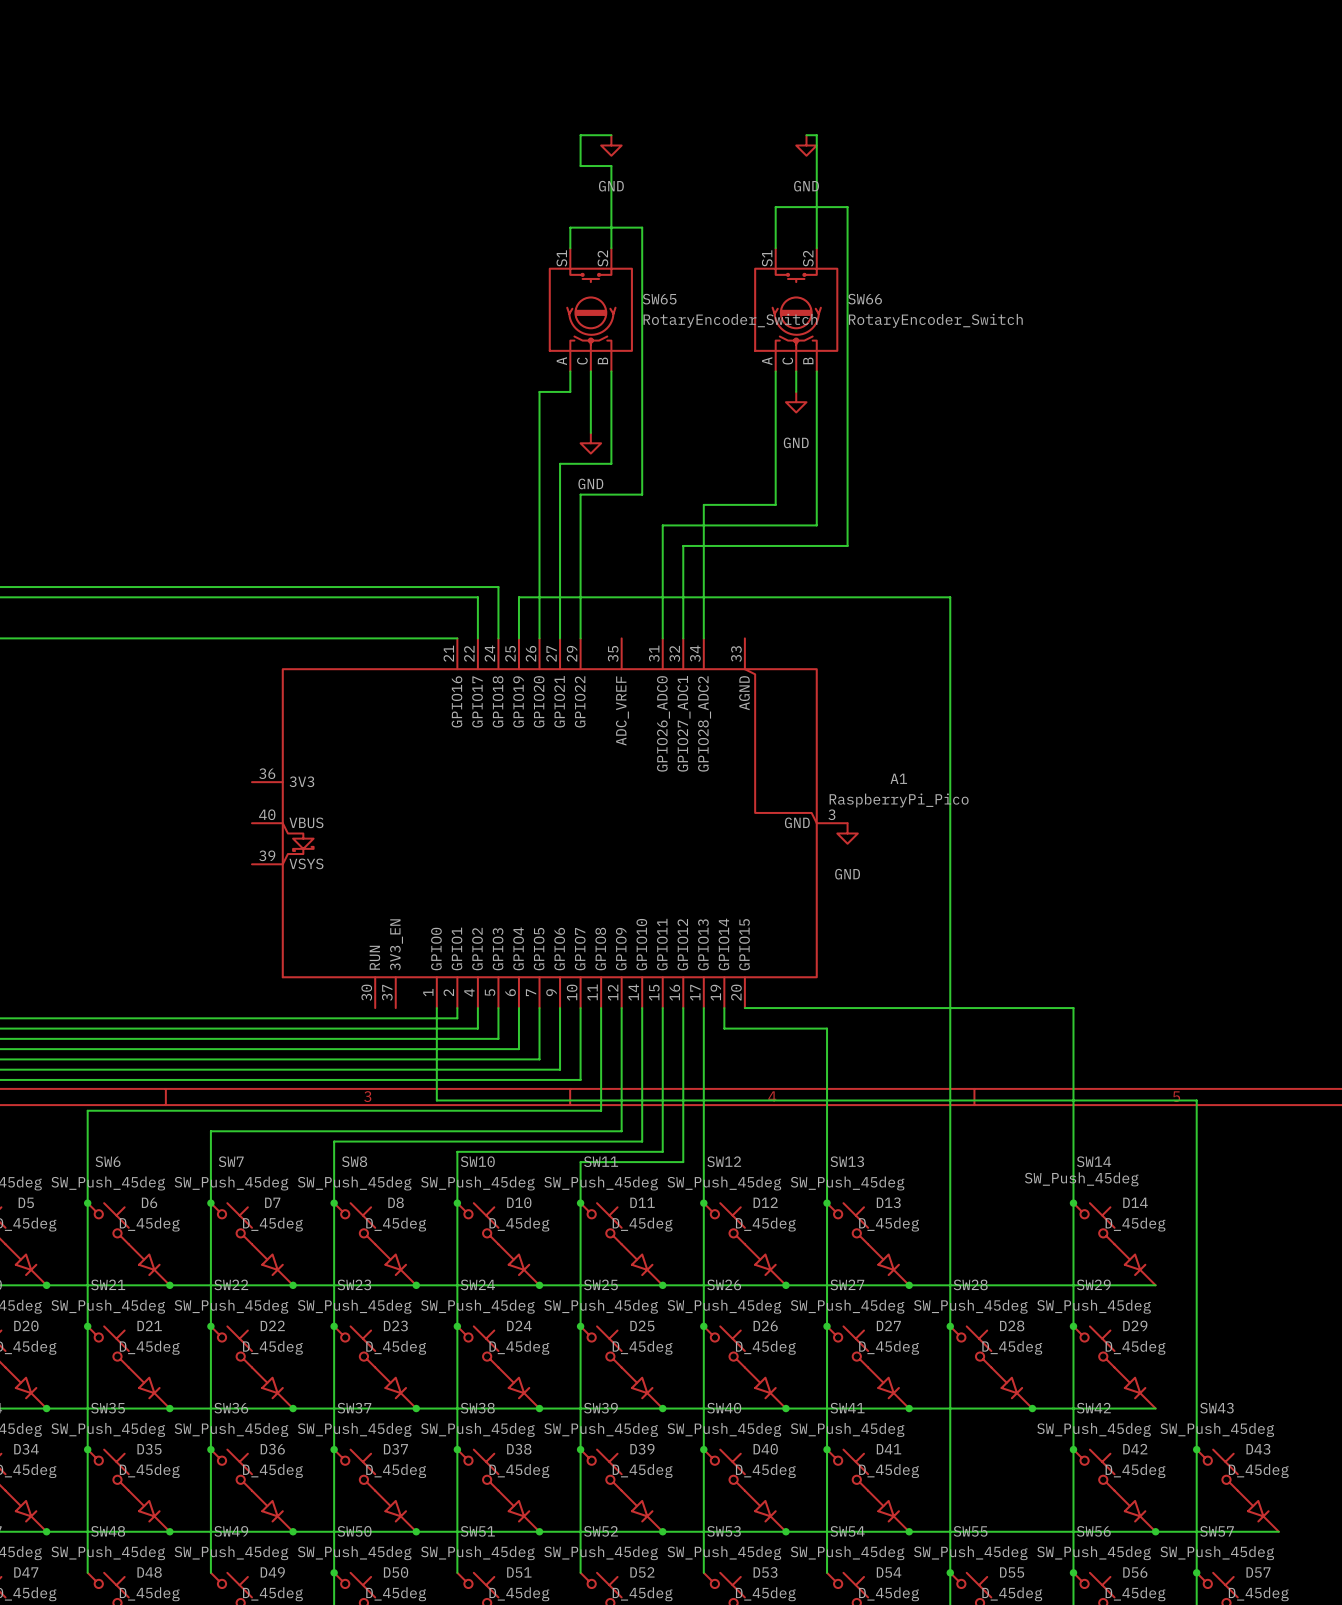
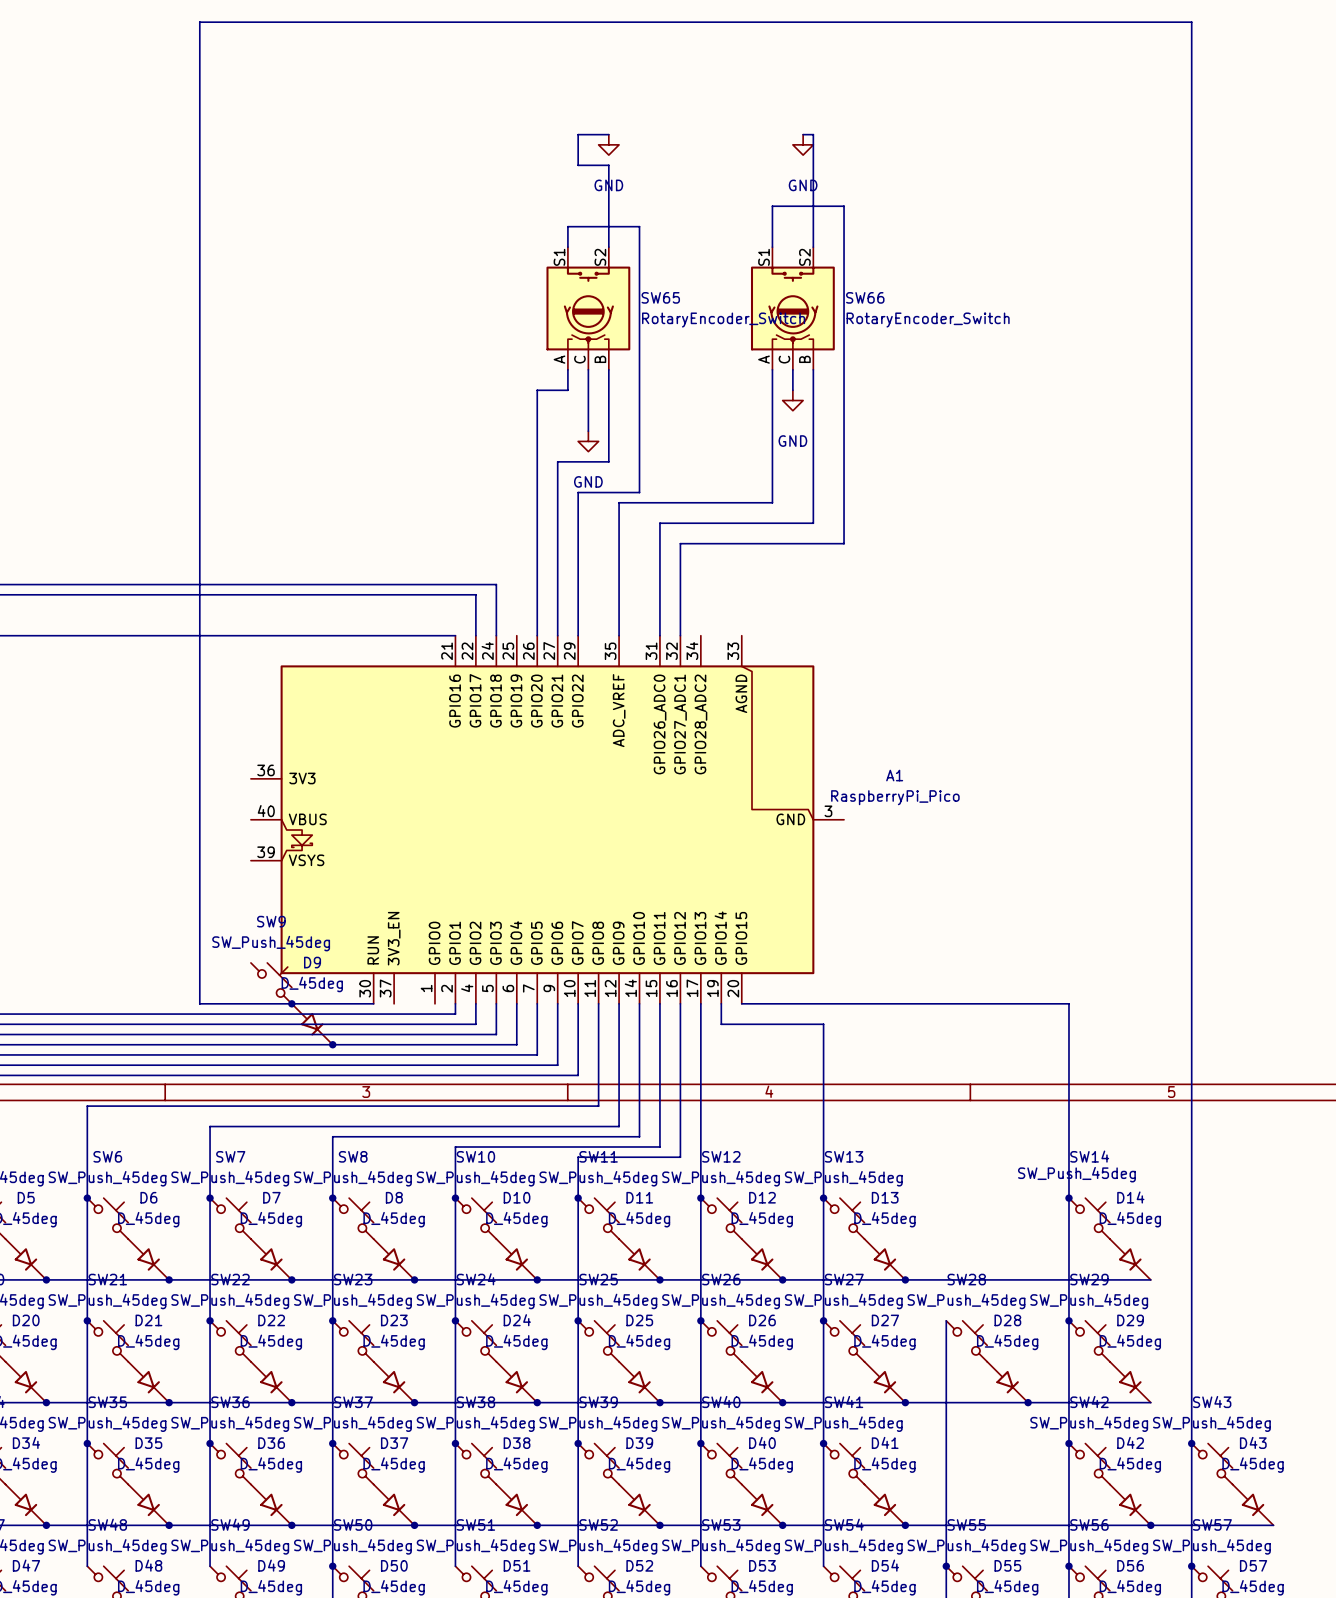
wire: (703, 504) (703, 638) -> (700, 502) (619, 502) (619, 635)
wire: (518, 638) (518, 597) (950, 597) (950, 1326) -> none
power symbol: GND (847, 833) -> none
SW9: none -> SW_Push_45deg (271, 983)
junction: none -> (291, 1003)
wire: (436, 1008) (436, 1100) (1196, 1100) -> (373, 1003) (199, 1003) (199, 22) (1191, 22) (1191, 1095)
D9: none -> D_45deg (312, 1024)
junction: none -> (332, 1044)
junction: (950, 1326) -> none

